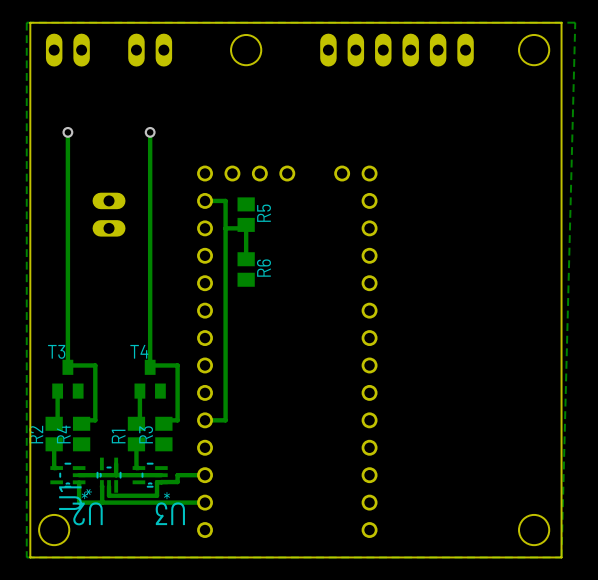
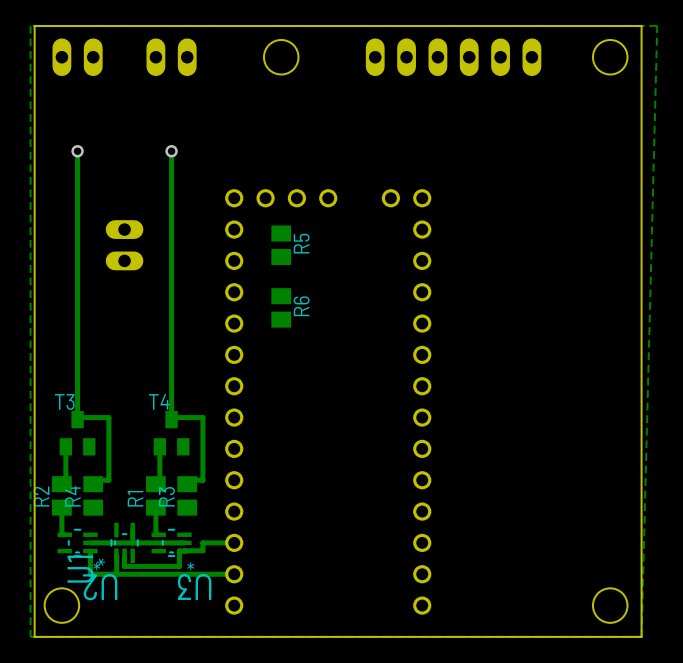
track: (205, 200) (225, 200) (225, 420) (205, 420) -> none
track: (246, 224) (246, 259) -> none
track: (246, 228) (225, 228) -> none

